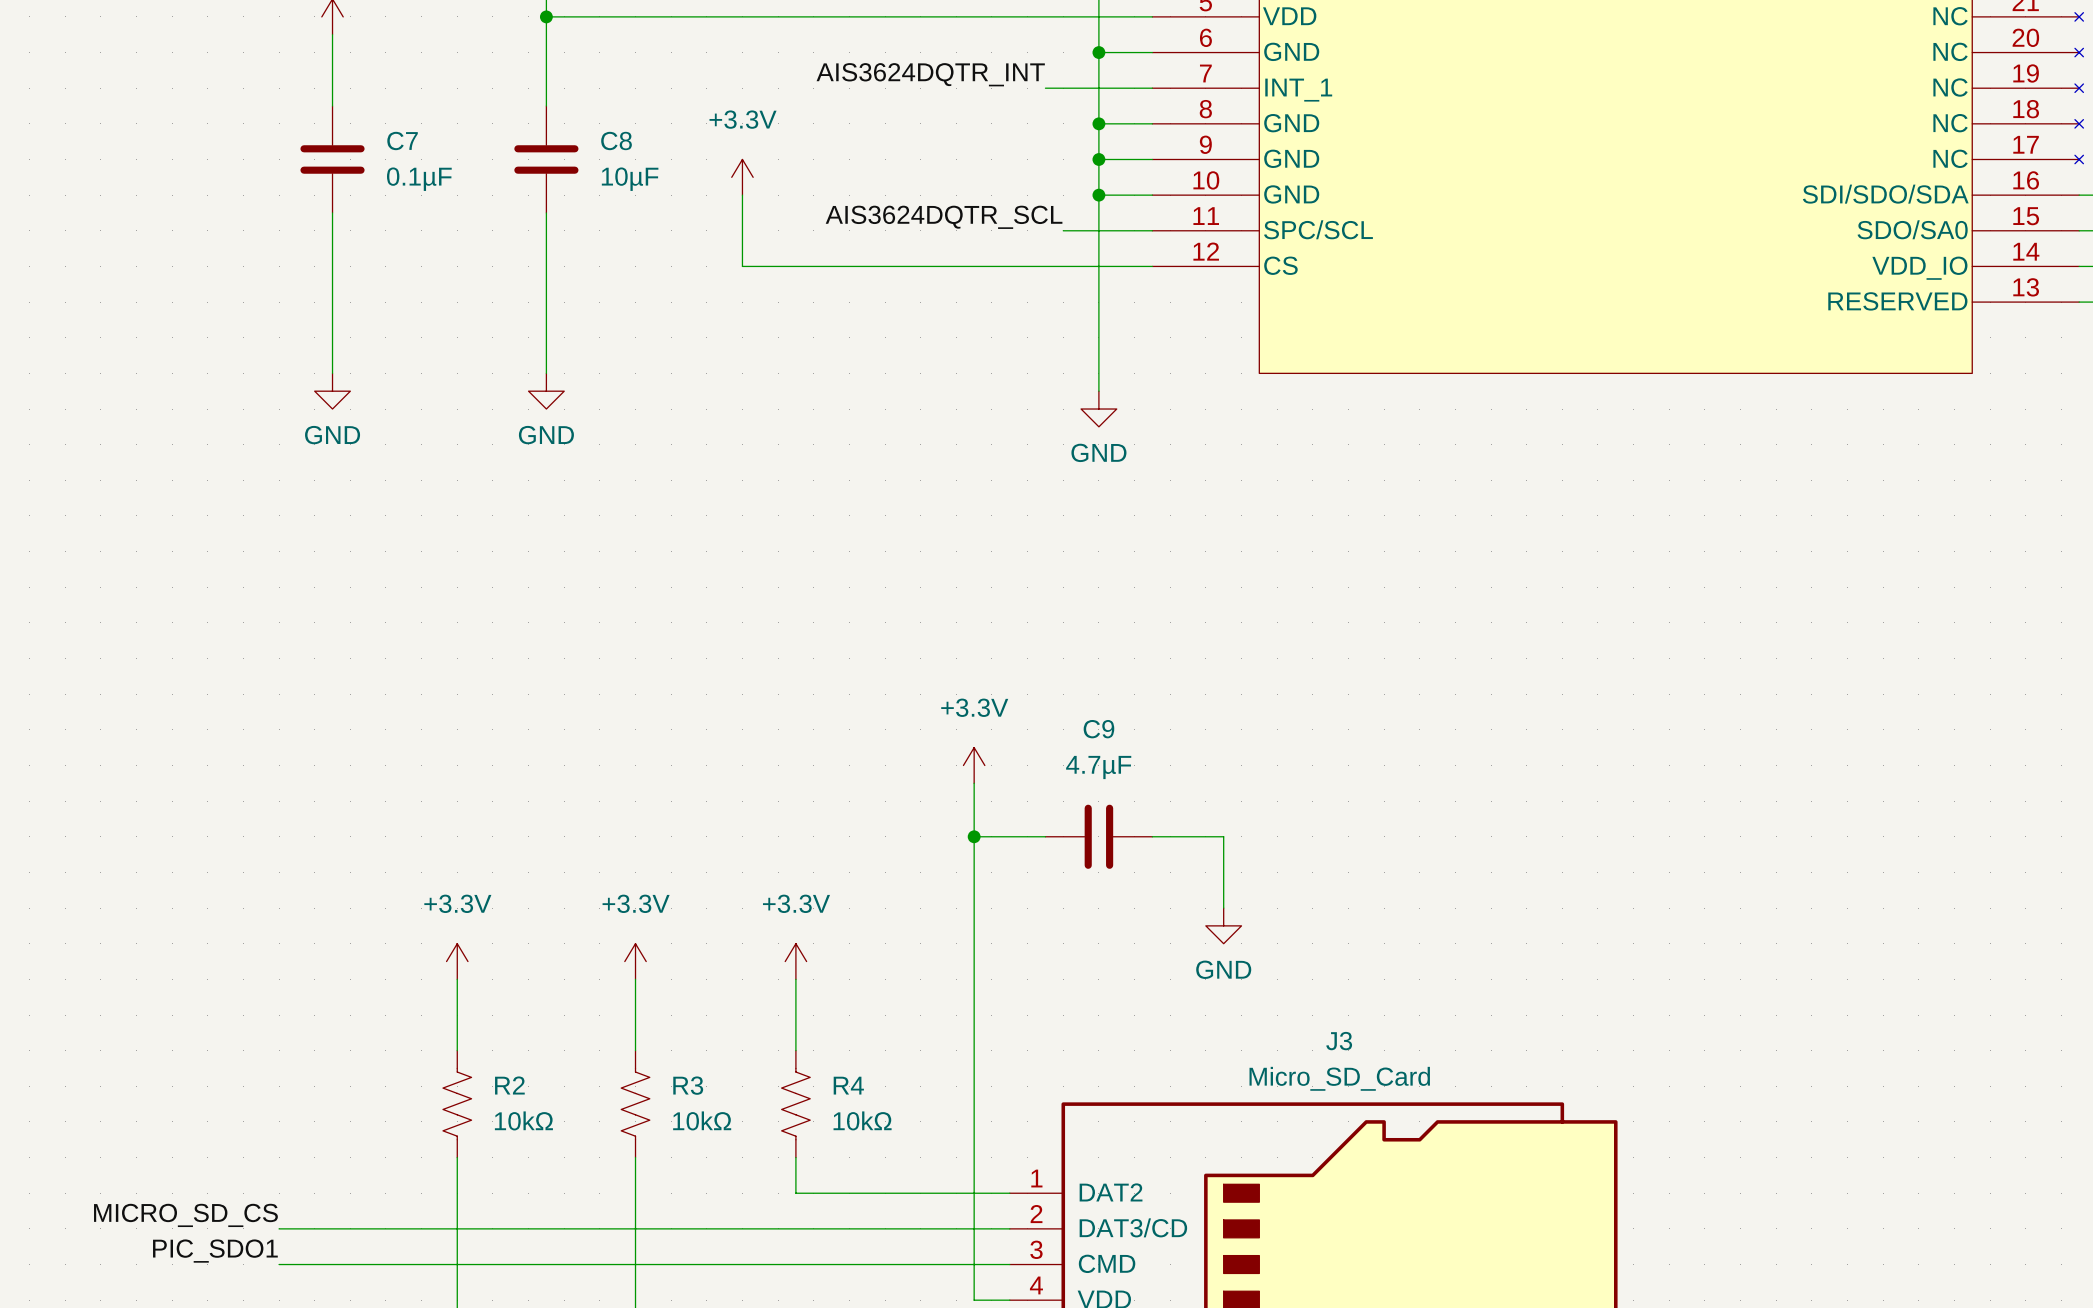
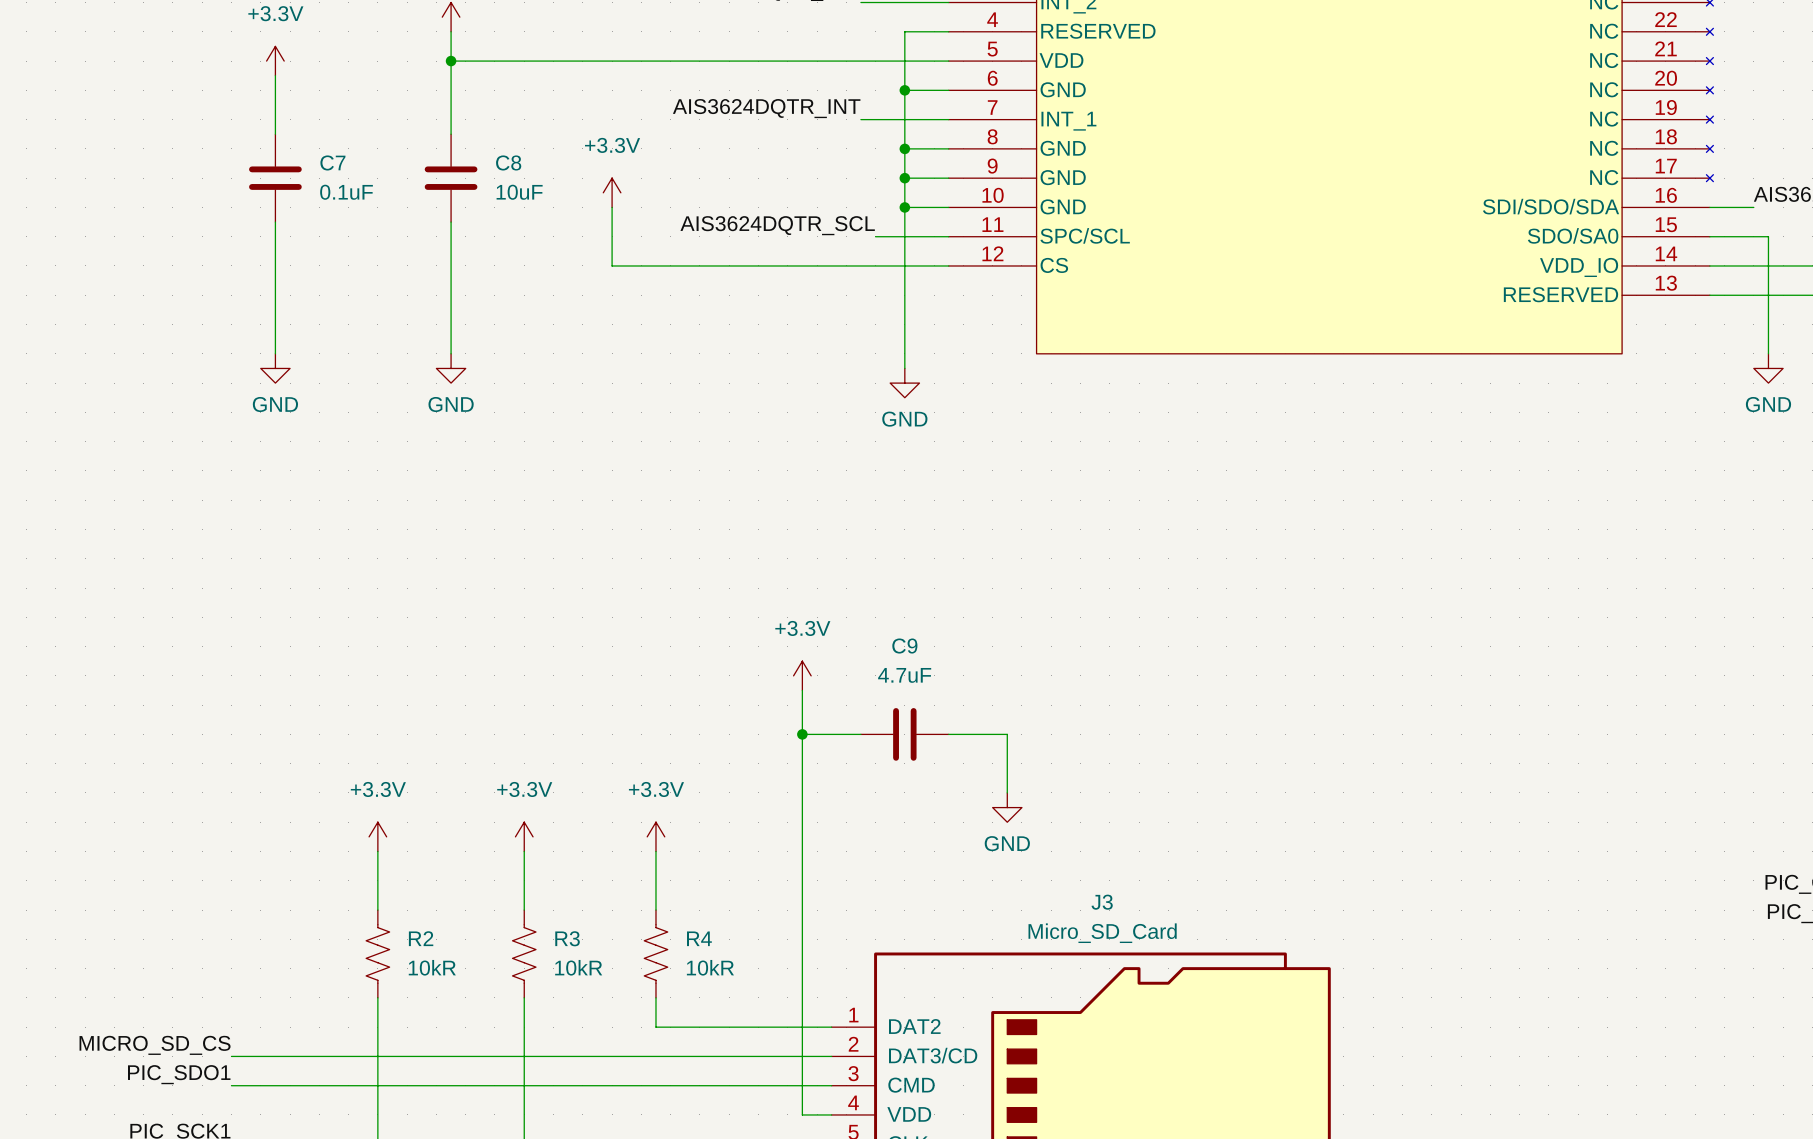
C7 value: 0.1µF (419, 179) -> 0.1uF (346, 192)
C8 value: 10µF (630, 179) -> 10uF (519, 192)
C9 value: 4.7µF (1098, 767) -> 4.7uF (904, 675)
R2 value: 10kΩ (523, 1120) -> 10kR (432, 967)
R3 value: 10kΩ (702, 1120) -> 10kR (578, 967)
R4 value: 10kΩ (862, 1120) -> 10kR (710, 967)

